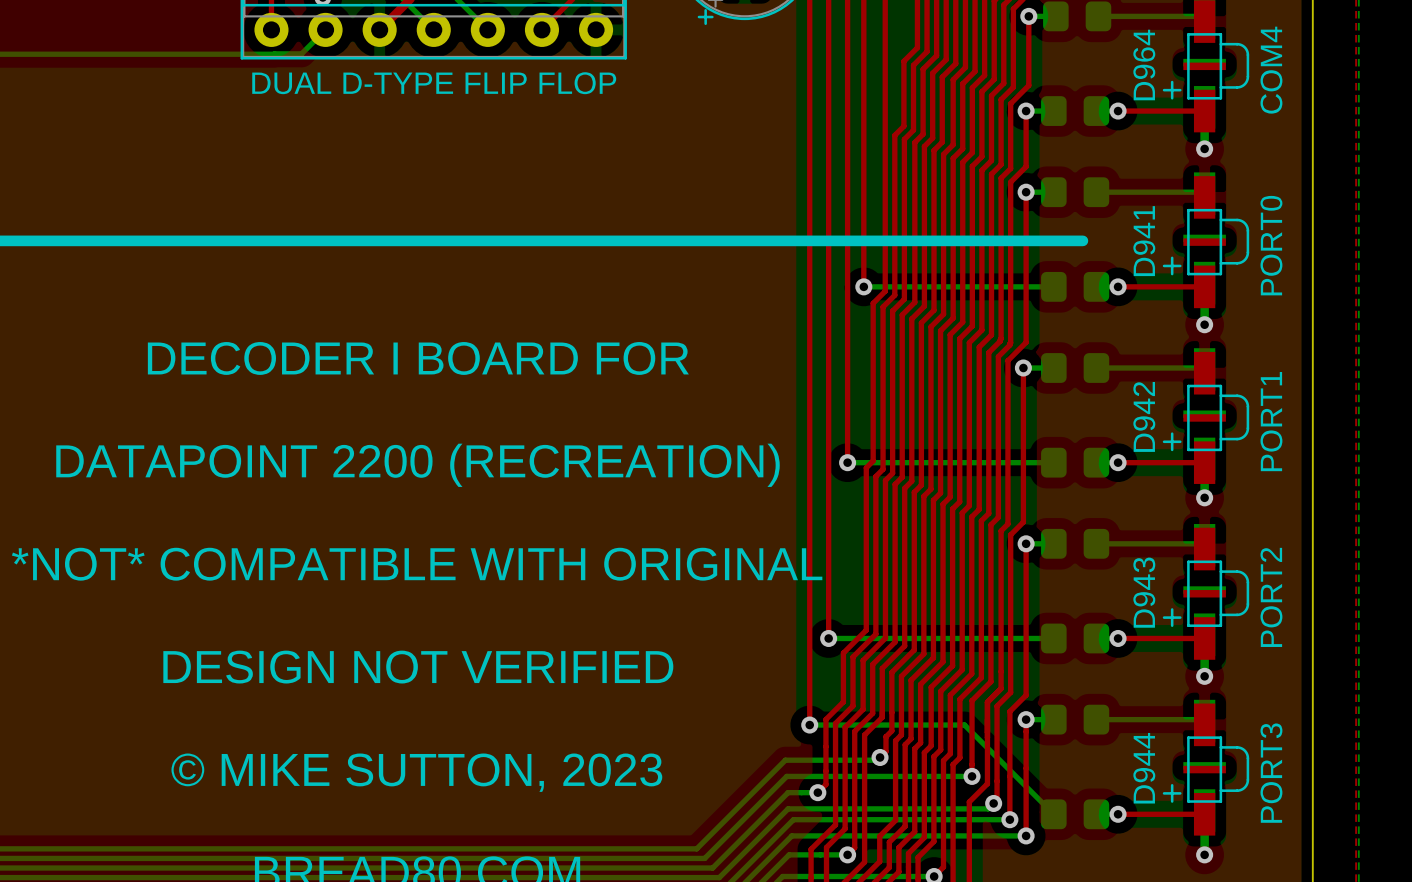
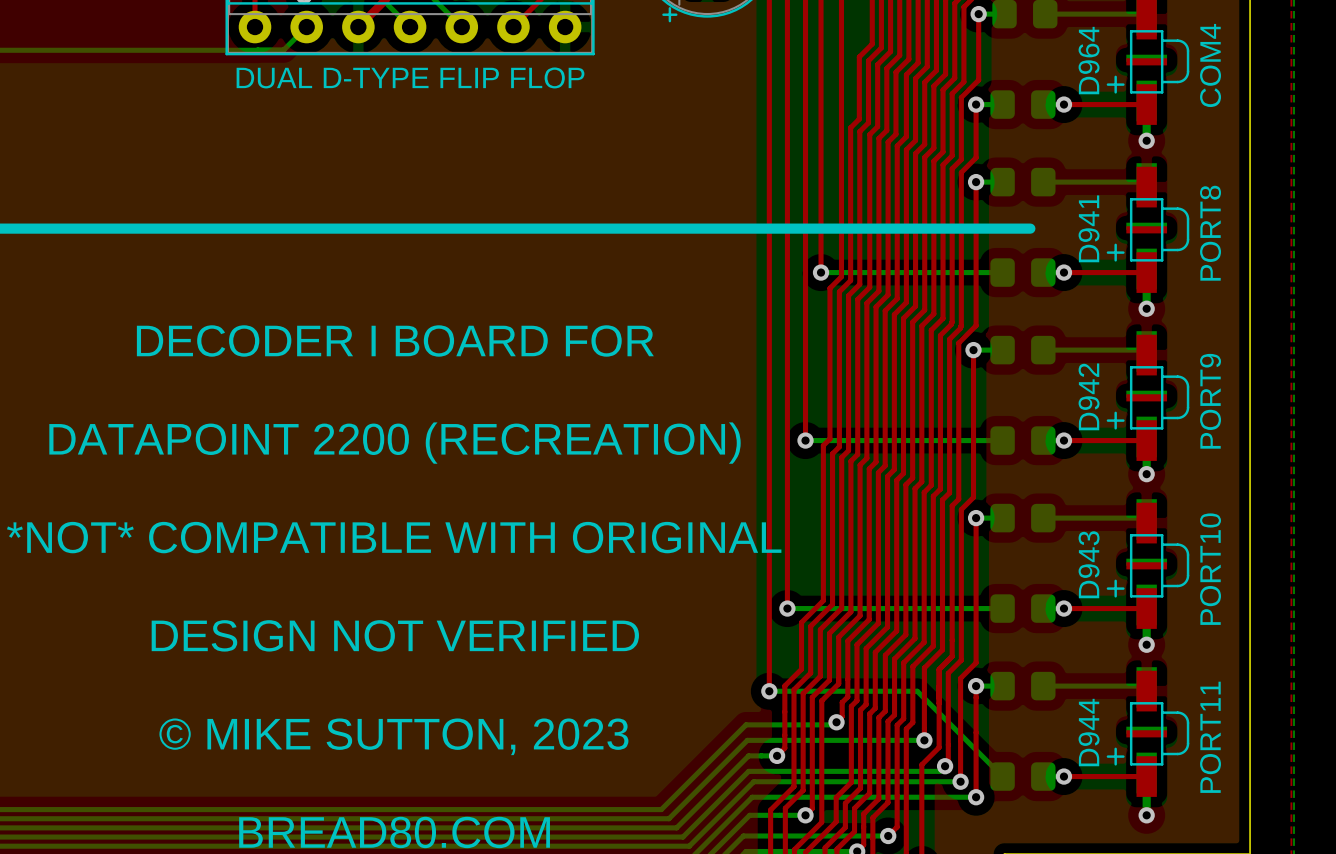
D941 value: PORT0 (1271, 245) -> PORT8 (1210, 233)
D942 value: PORT1 (1271, 421) -> PORT9 (1210, 401)
D943 value: PORT2 (1271, 597) -> PORT10 (1210, 569)
D944 value: PORT3 (1271, 773) -> PORT11 (1210, 737)

